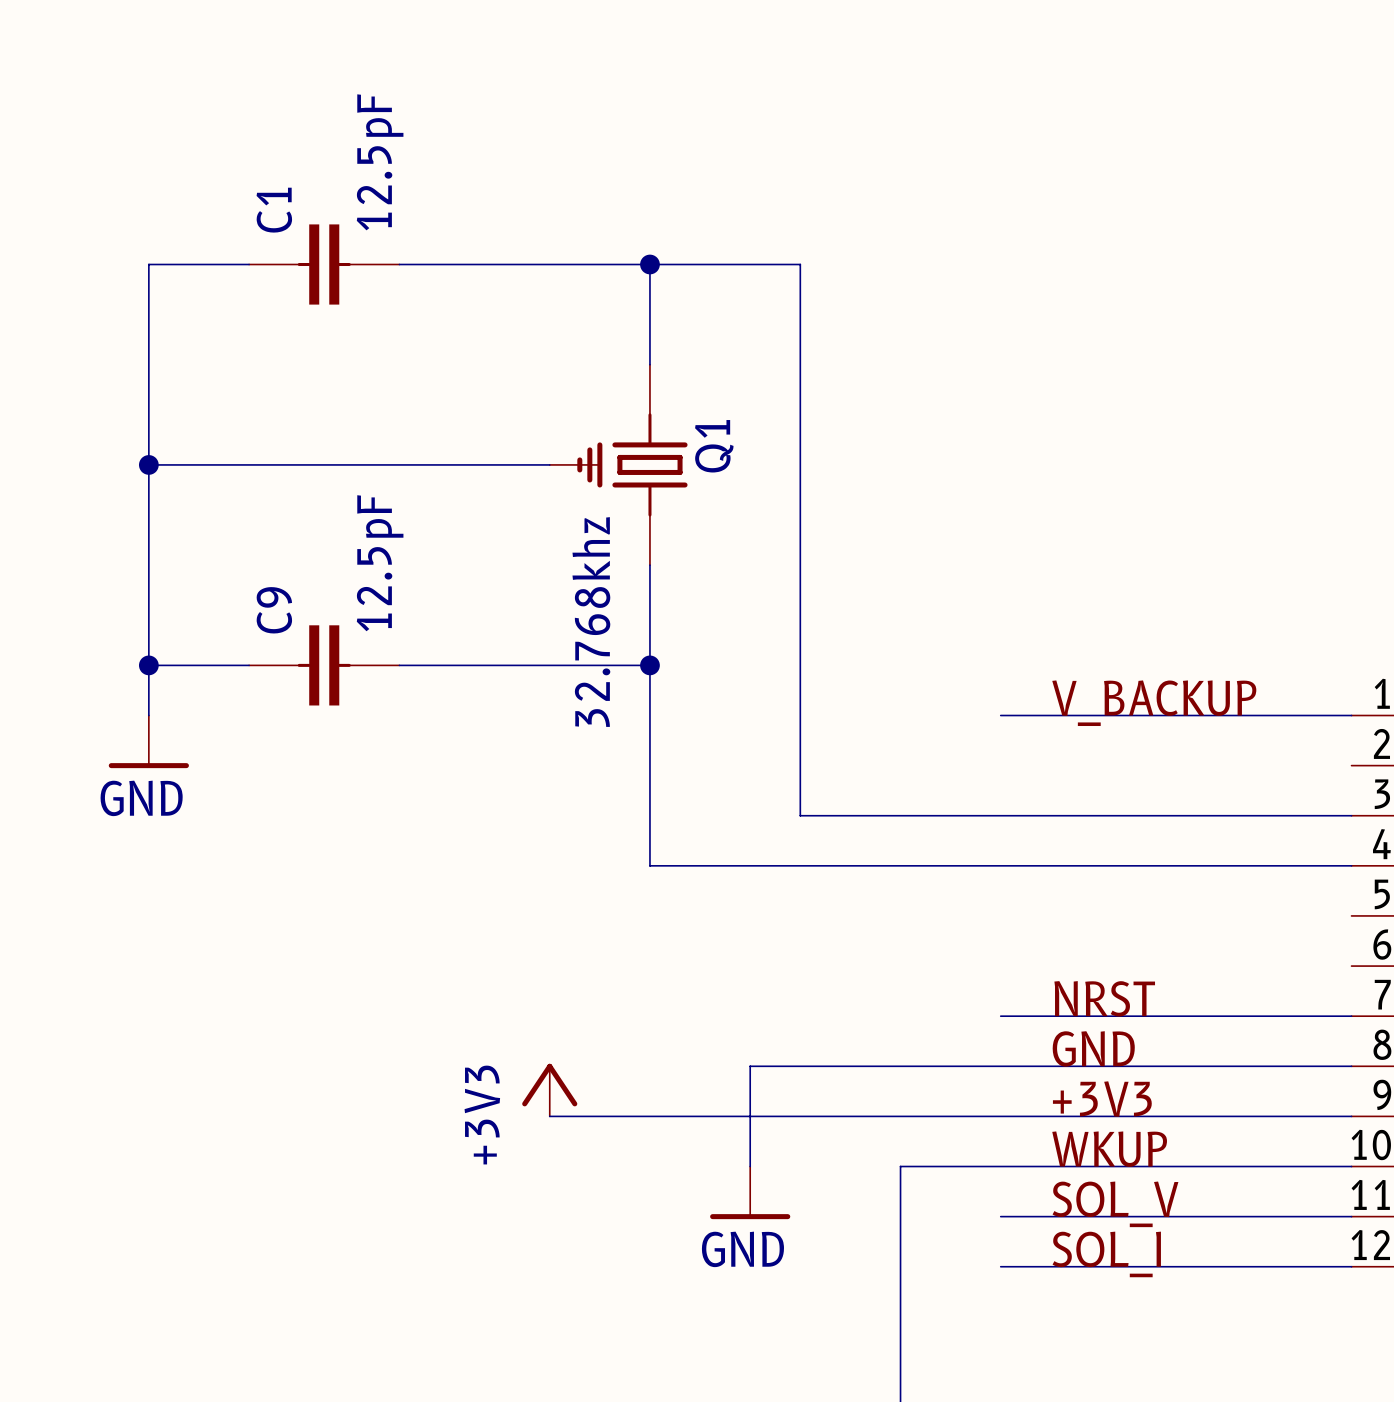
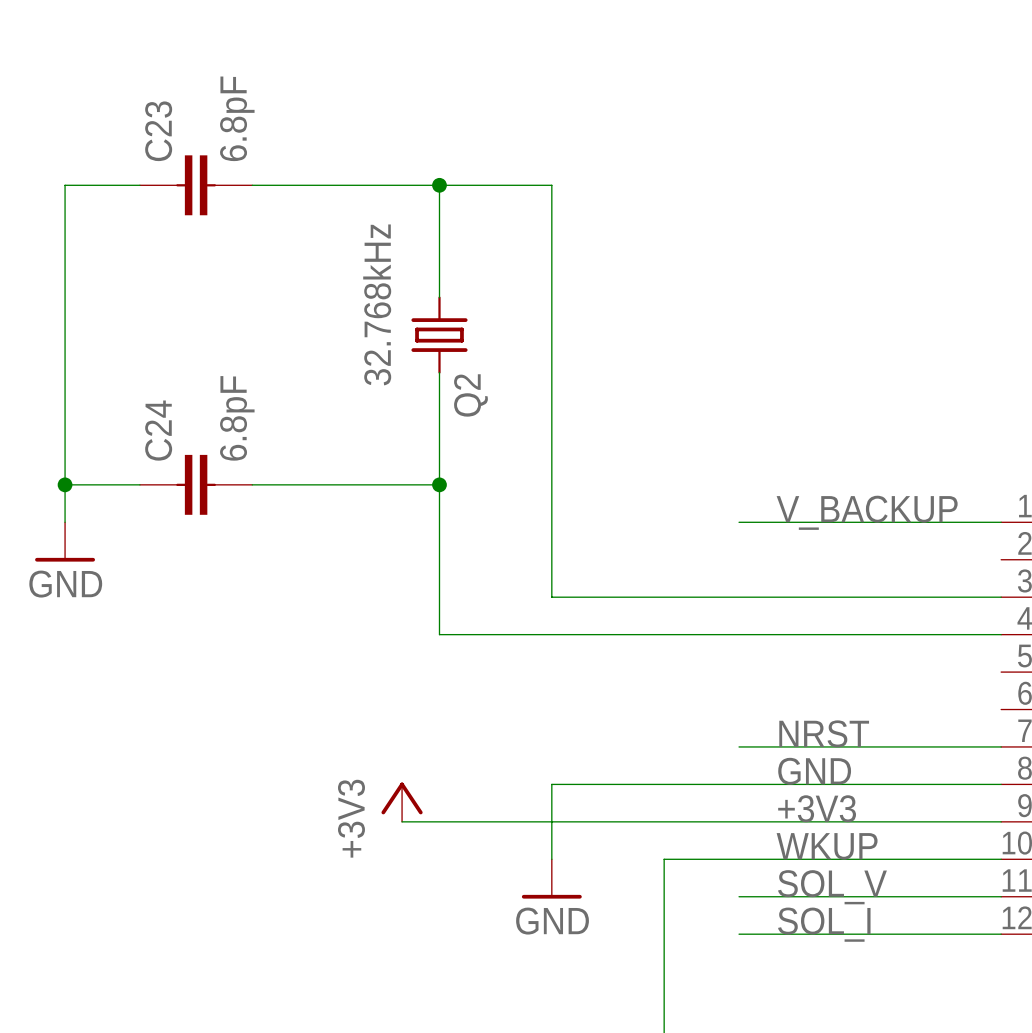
wire: (148, 264) (148, 715) -> (102, 185) (65, 185) (65, 522)
C23: none -> 6.8pF (196, 185)
C1: 12.5pF (324, 264) -> none
wire: none -> (439, 185) (439, 297)
wire: (649, 264) (649, 364) -> none
junction position: (649, 264) -> (439, 185)
wire: (750, 264) (800, 264) (800, 815) -> (551, 185) (551, 597) (589, 597)
wire: (148, 464) (549, 464) -> none
junction: (148, 464) -> none
Q2: none -> 32.768kHz (439, 335)
Q1: 32.768khz (618, 464) -> none
wire: (649, 565) (649, 865) -> (439, 372) (439, 634) (476, 634)
wire: none -> (65, 484) (102, 484)
junction position: (148, 665) -> (65, 484)
C24: none -> 6.8pF (196, 484)
C9: 12.5pF (324, 665) -> none
wire: (599, 665) (649, 665) -> none
junction position: (649, 665) -> (439, 484)
power symbol position: GND (148, 741) -> GND (65, 541)

